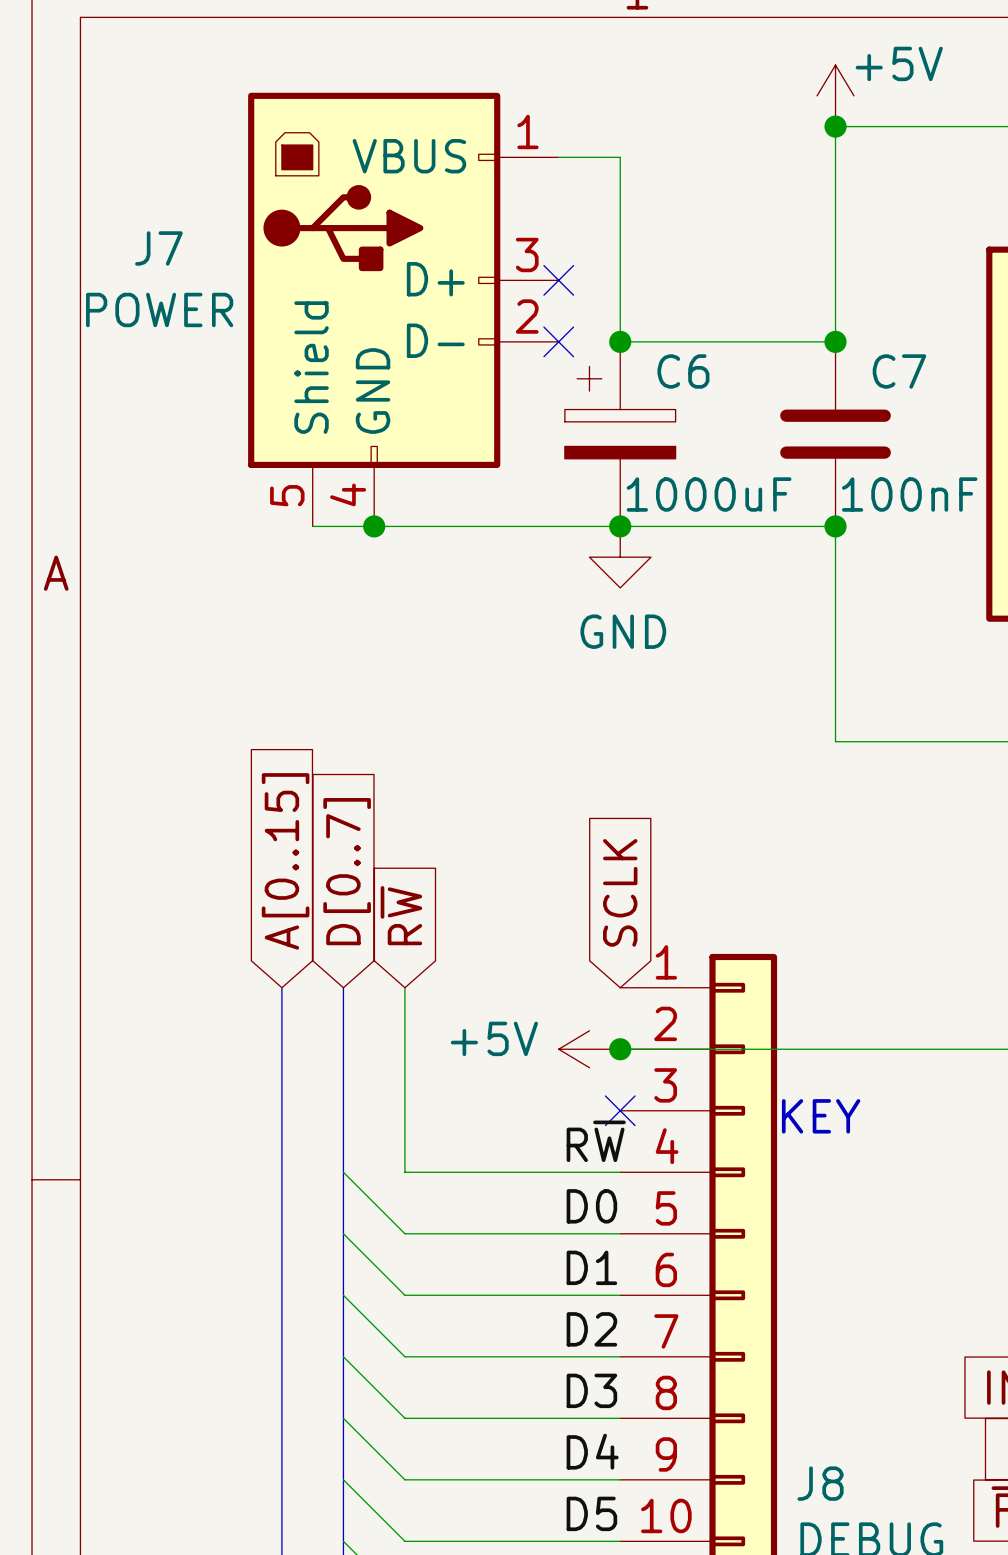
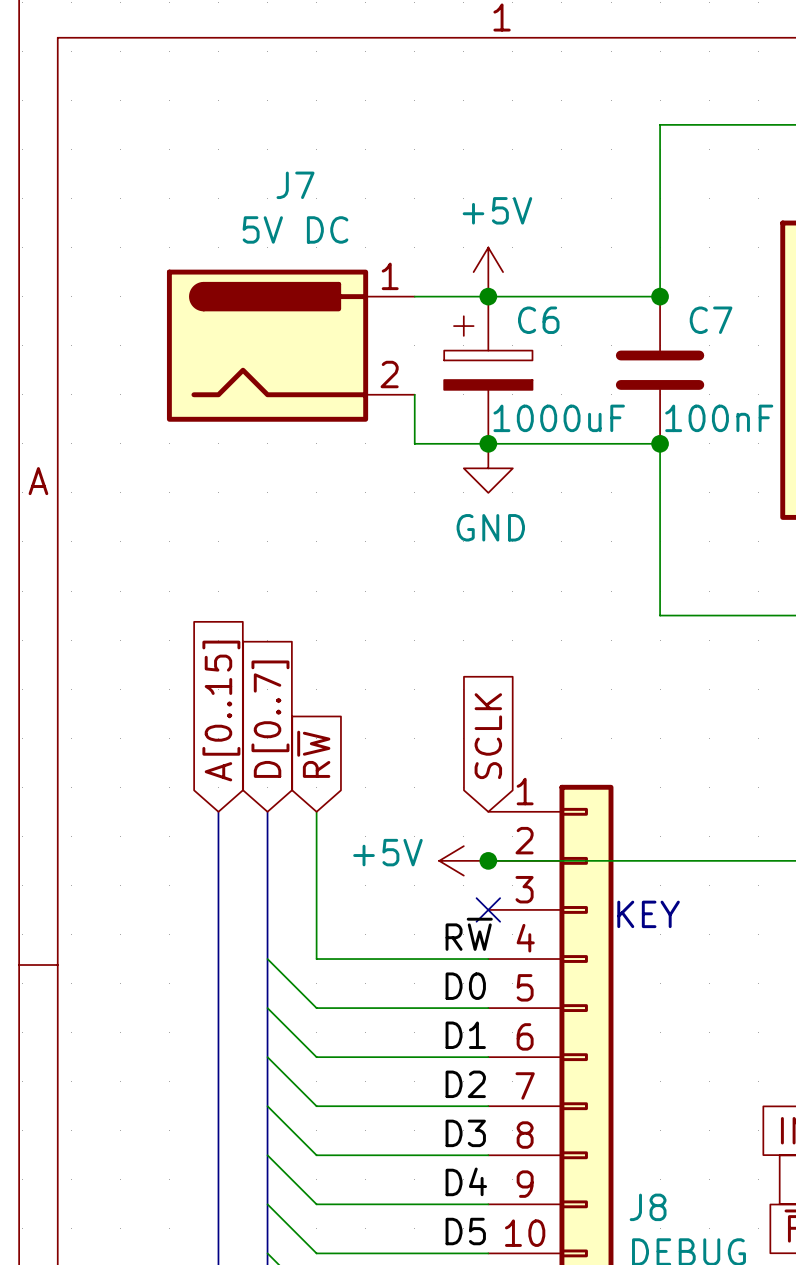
power symbol text position: +5V (899, 63) -> +5V (497, 210)
J7 symbol: [248, 92, 559, 527] -> [166, 269, 415, 422]
power symbol position: +5V (835, 95) -> +5V (488, 272)
junction: (835, 126) -> none
wire: (558, 157) (620, 157) (620, 341) -> (414, 296) (488, 296)
J7 name position: J7 (158, 248) -> J7 (295, 185)
no-connect mark: (558, 280) -> none
J7 value: POWER (159, 309) -> 5V DC (295, 229)
no-connect mark: (558, 341) -> none
wire: (312, 526) (527, 526) -> (414, 394) (414, 443)
junction: (374, 526) -> none

